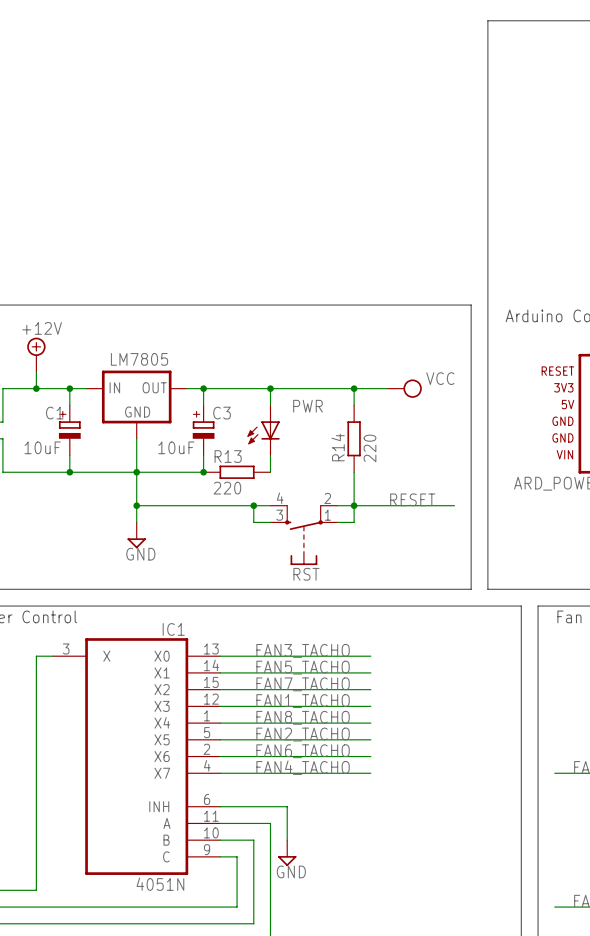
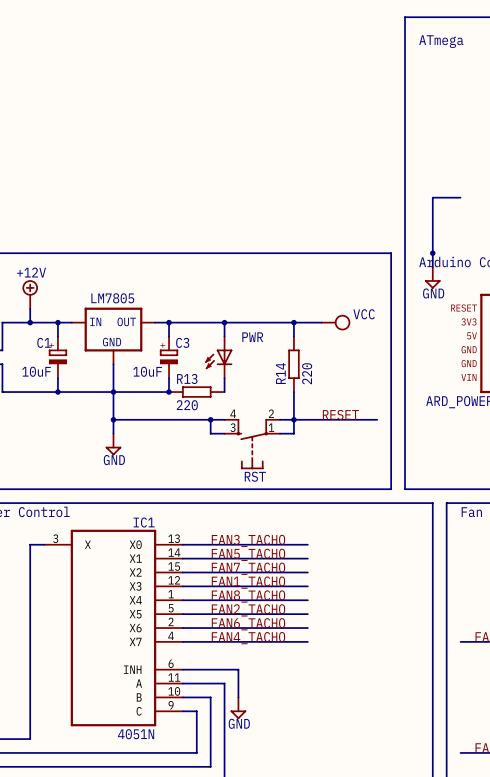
text: none -> ATmega (441, 41)
wire: none -> (460, 197) (432, 197) (432, 267)
junction: none -> (432, 253)
power symbol: none -> GND (432, 277)

